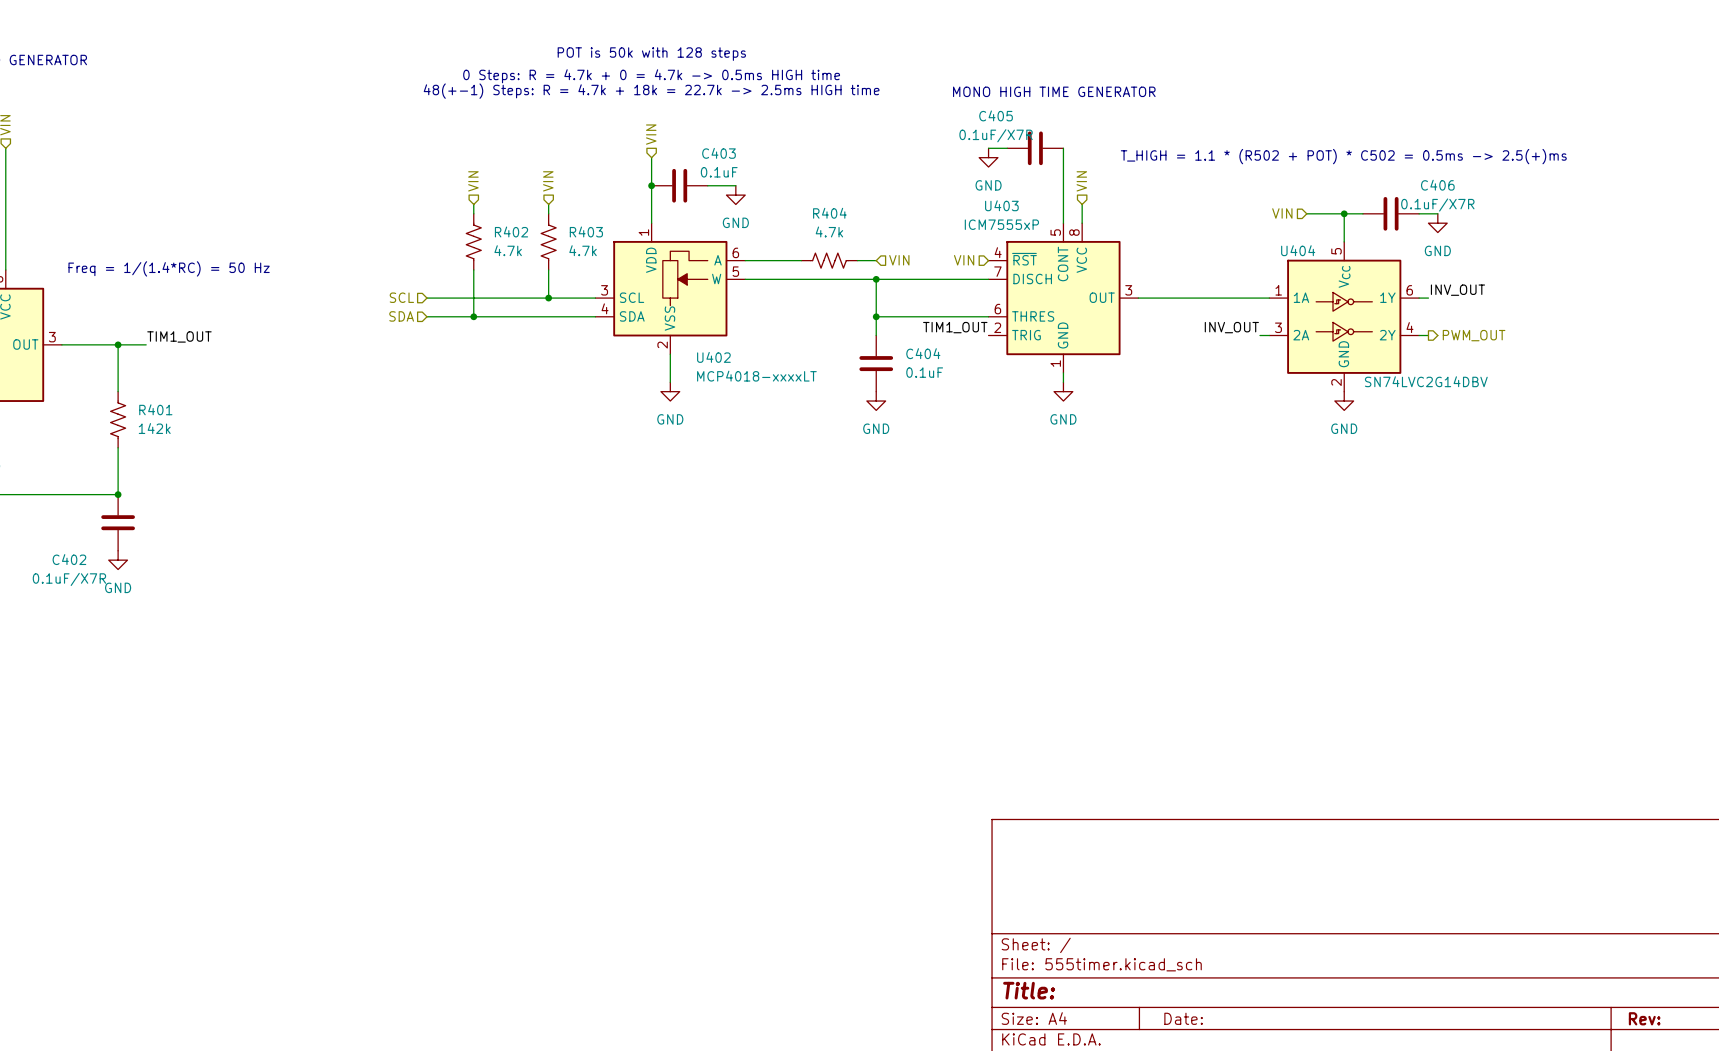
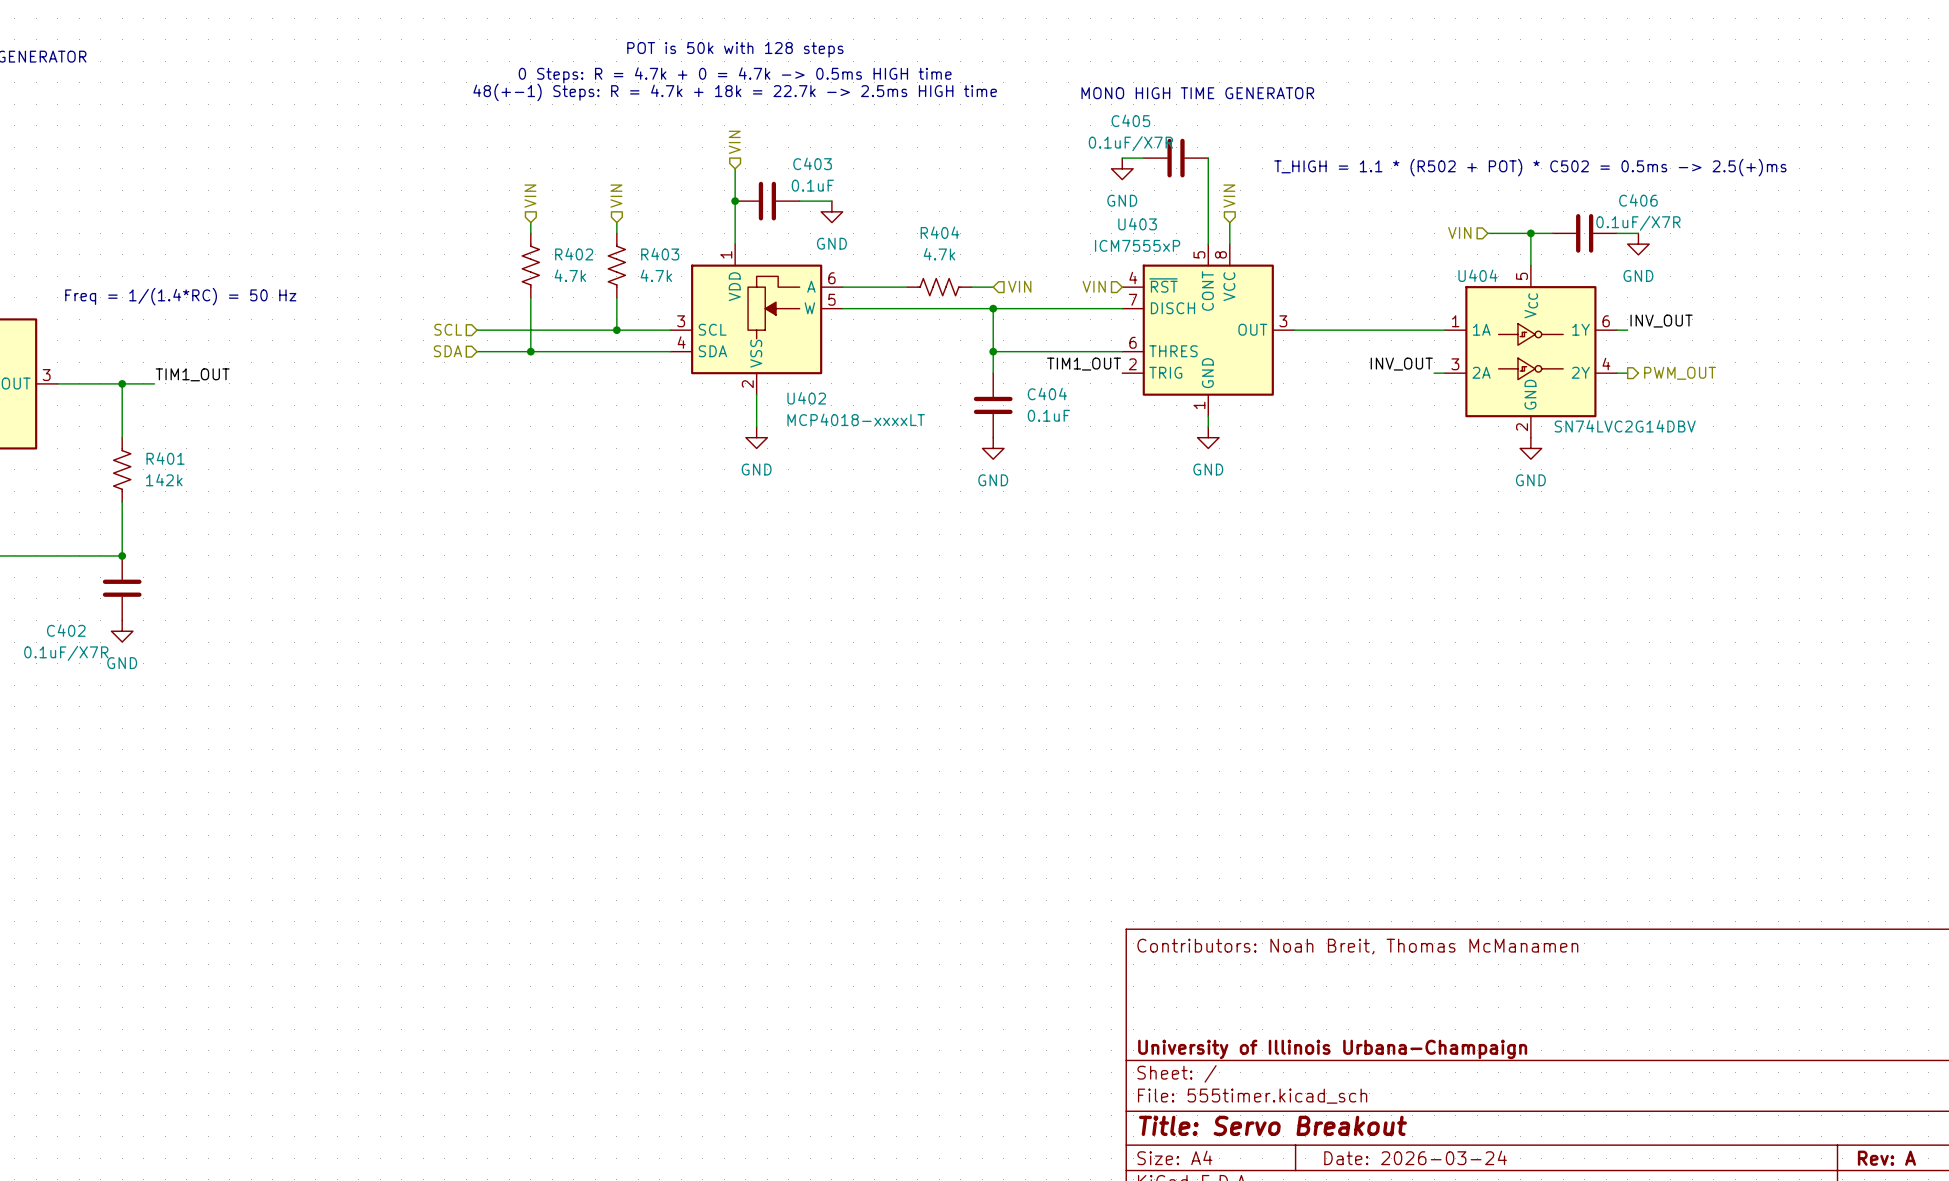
title block: none -> Contributors: Noah Breit, Thomas McManamen (1357, 946)
title block: none -> University of Illinois Urbana-Champaign (1332, 1049)
title block: Title: (1029, 990) -> Title: Servo Breakout (1272, 1125)
title block: Date: (1183, 1018) -> Date: 2026-03-24 (1415, 1157)
title block: Rev: (1644, 1018) -> Rev: A (1886, 1158)

